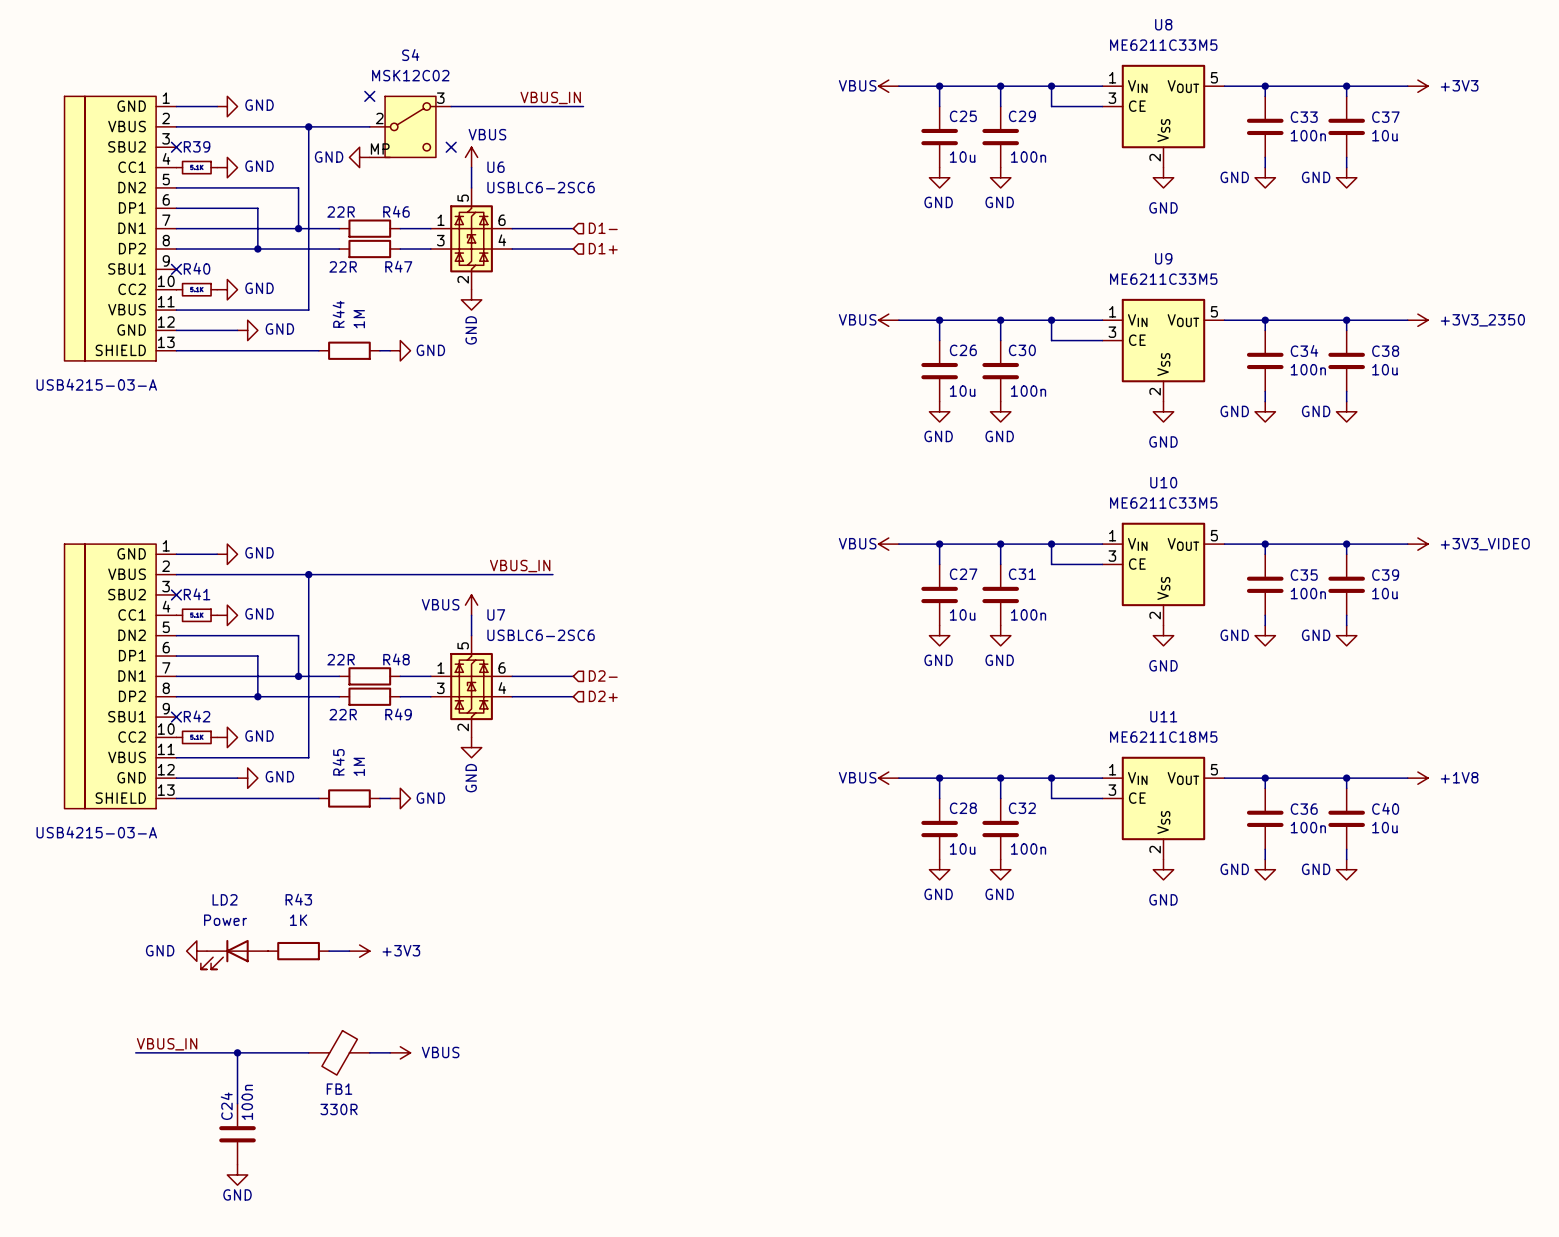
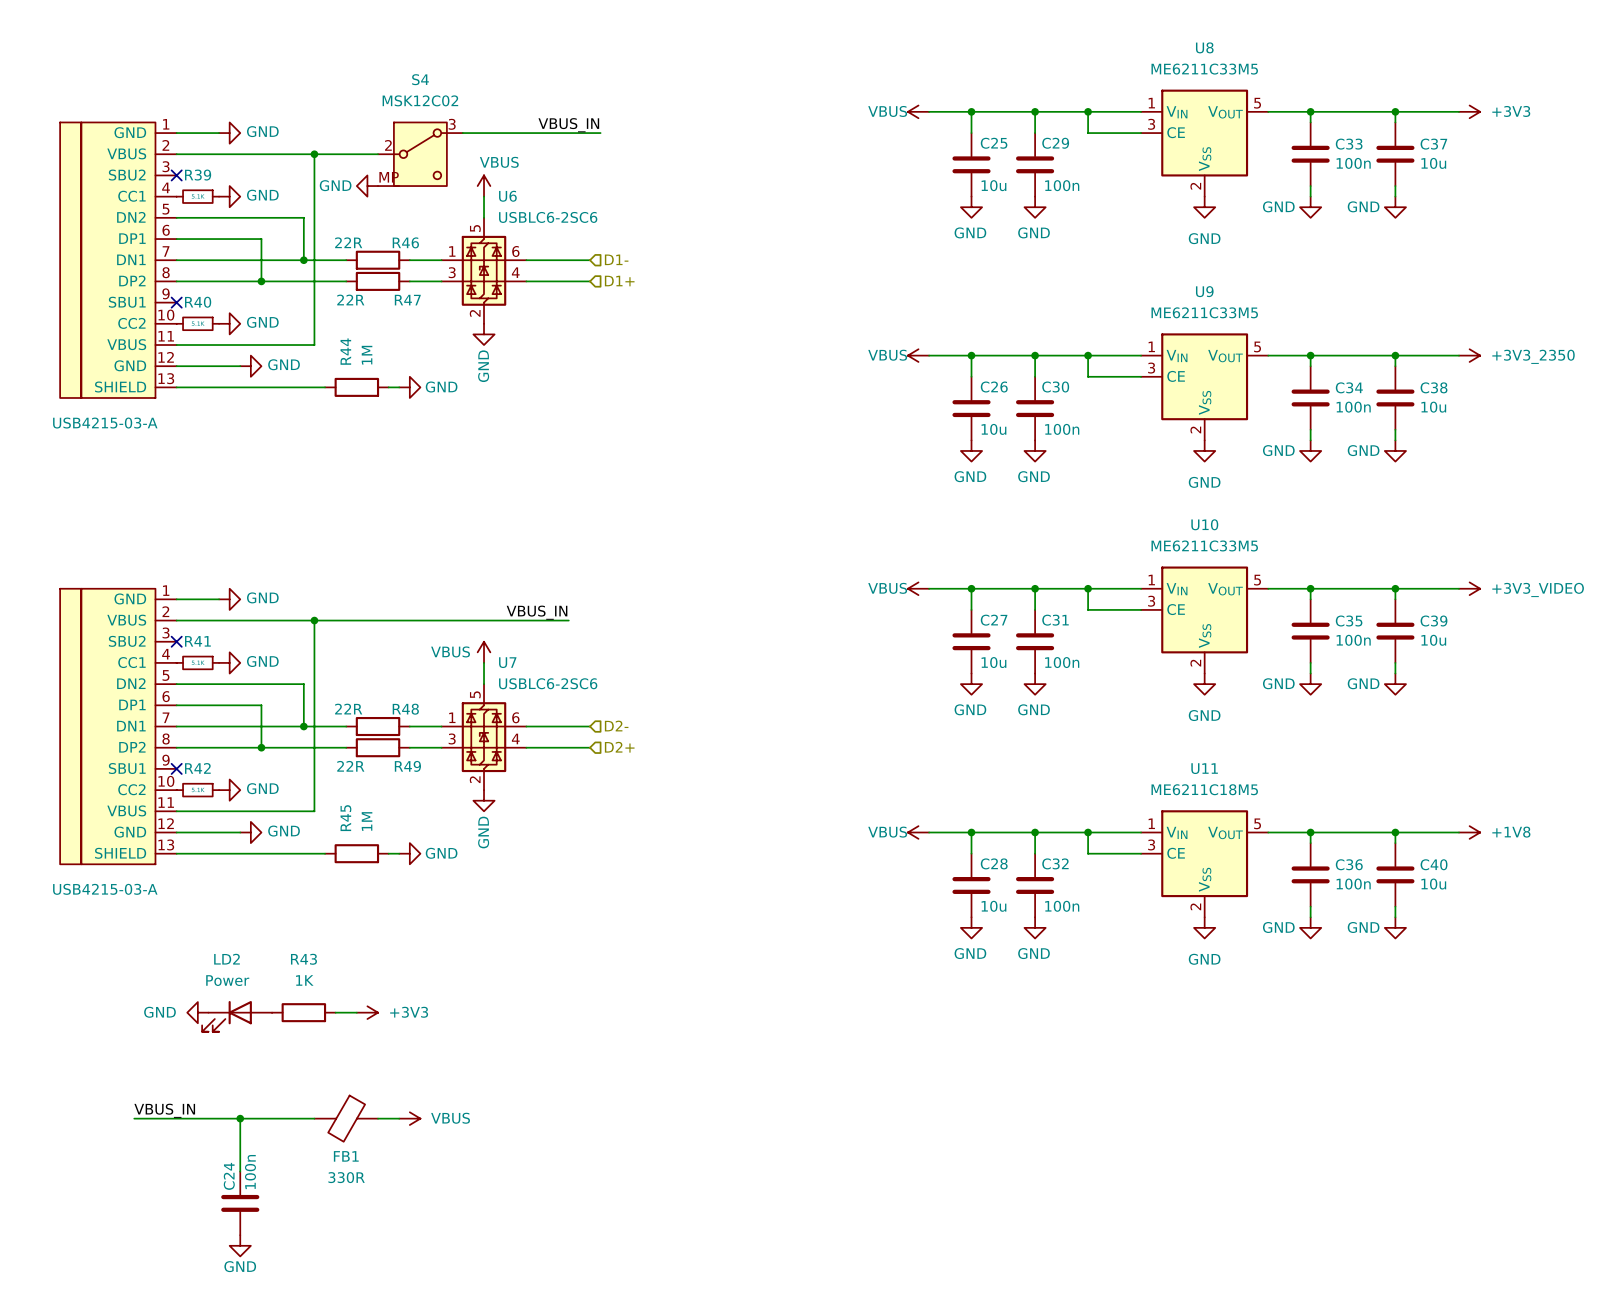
no-connect mark: (369, 96) -> none
no-connect mark: (451, 147) -> none

